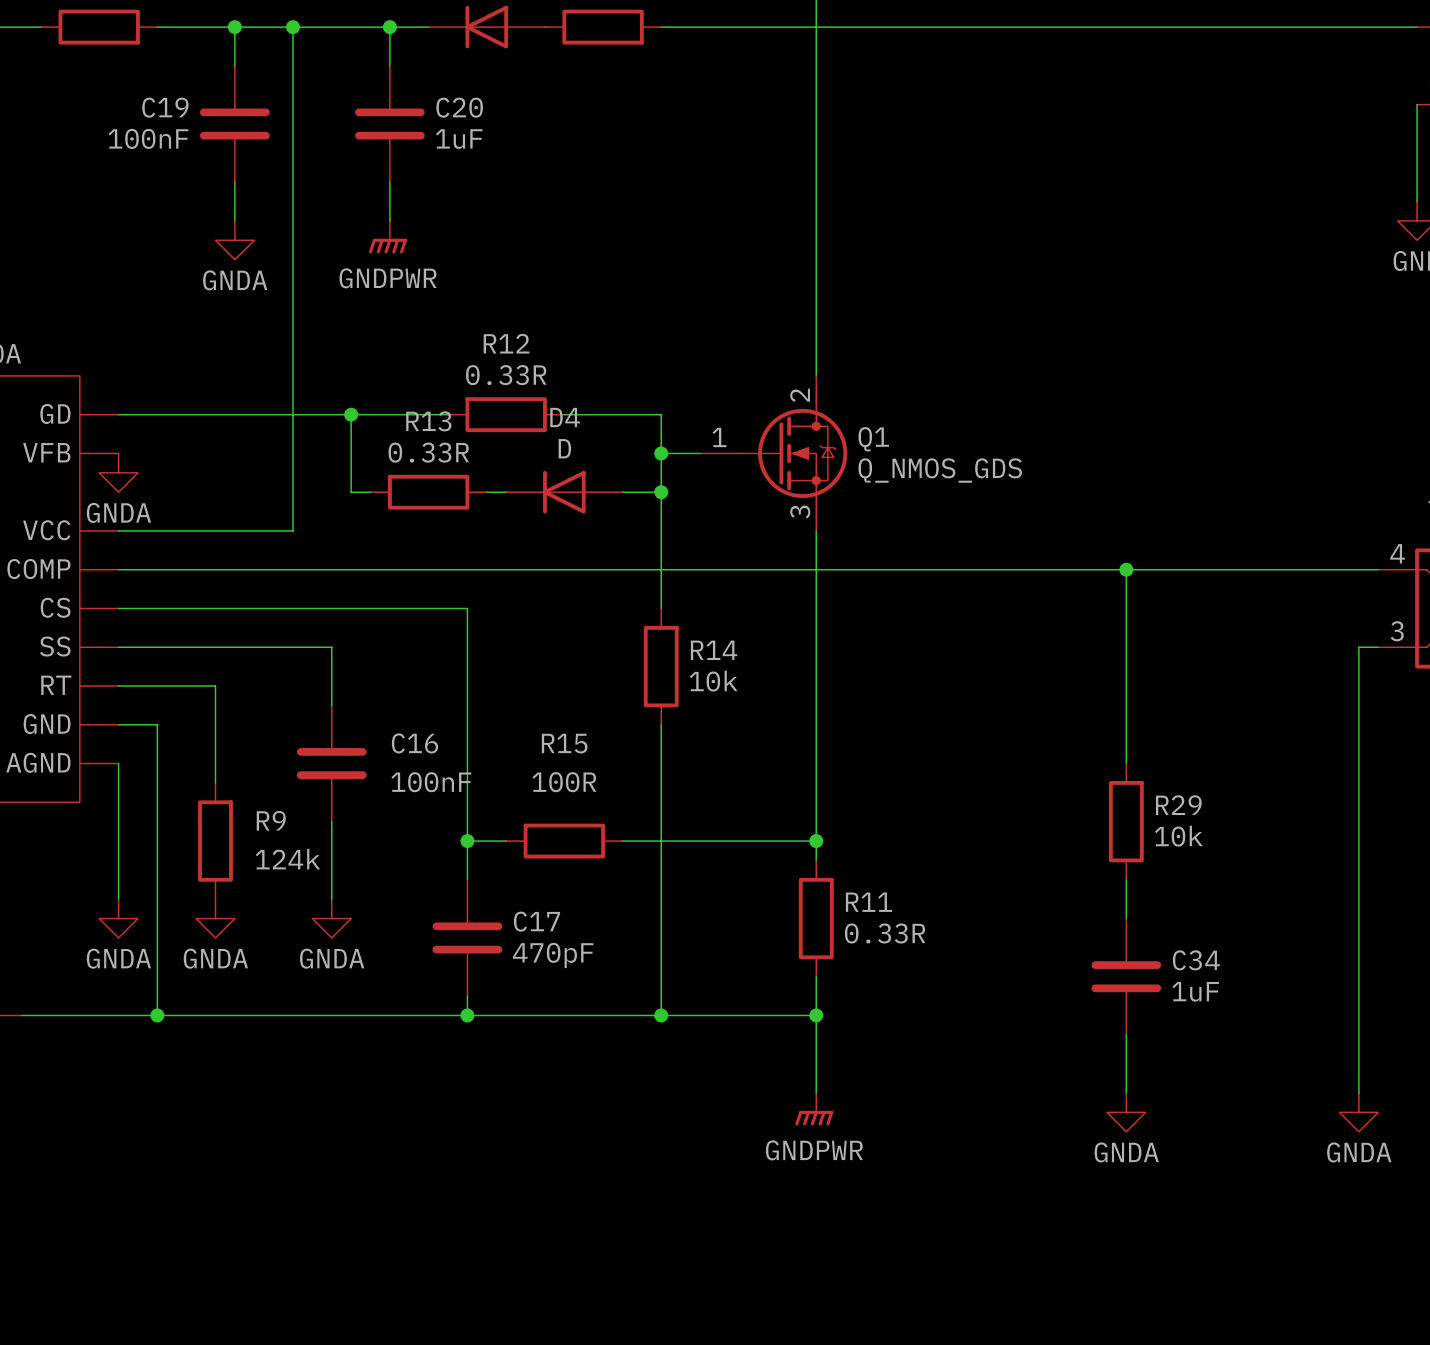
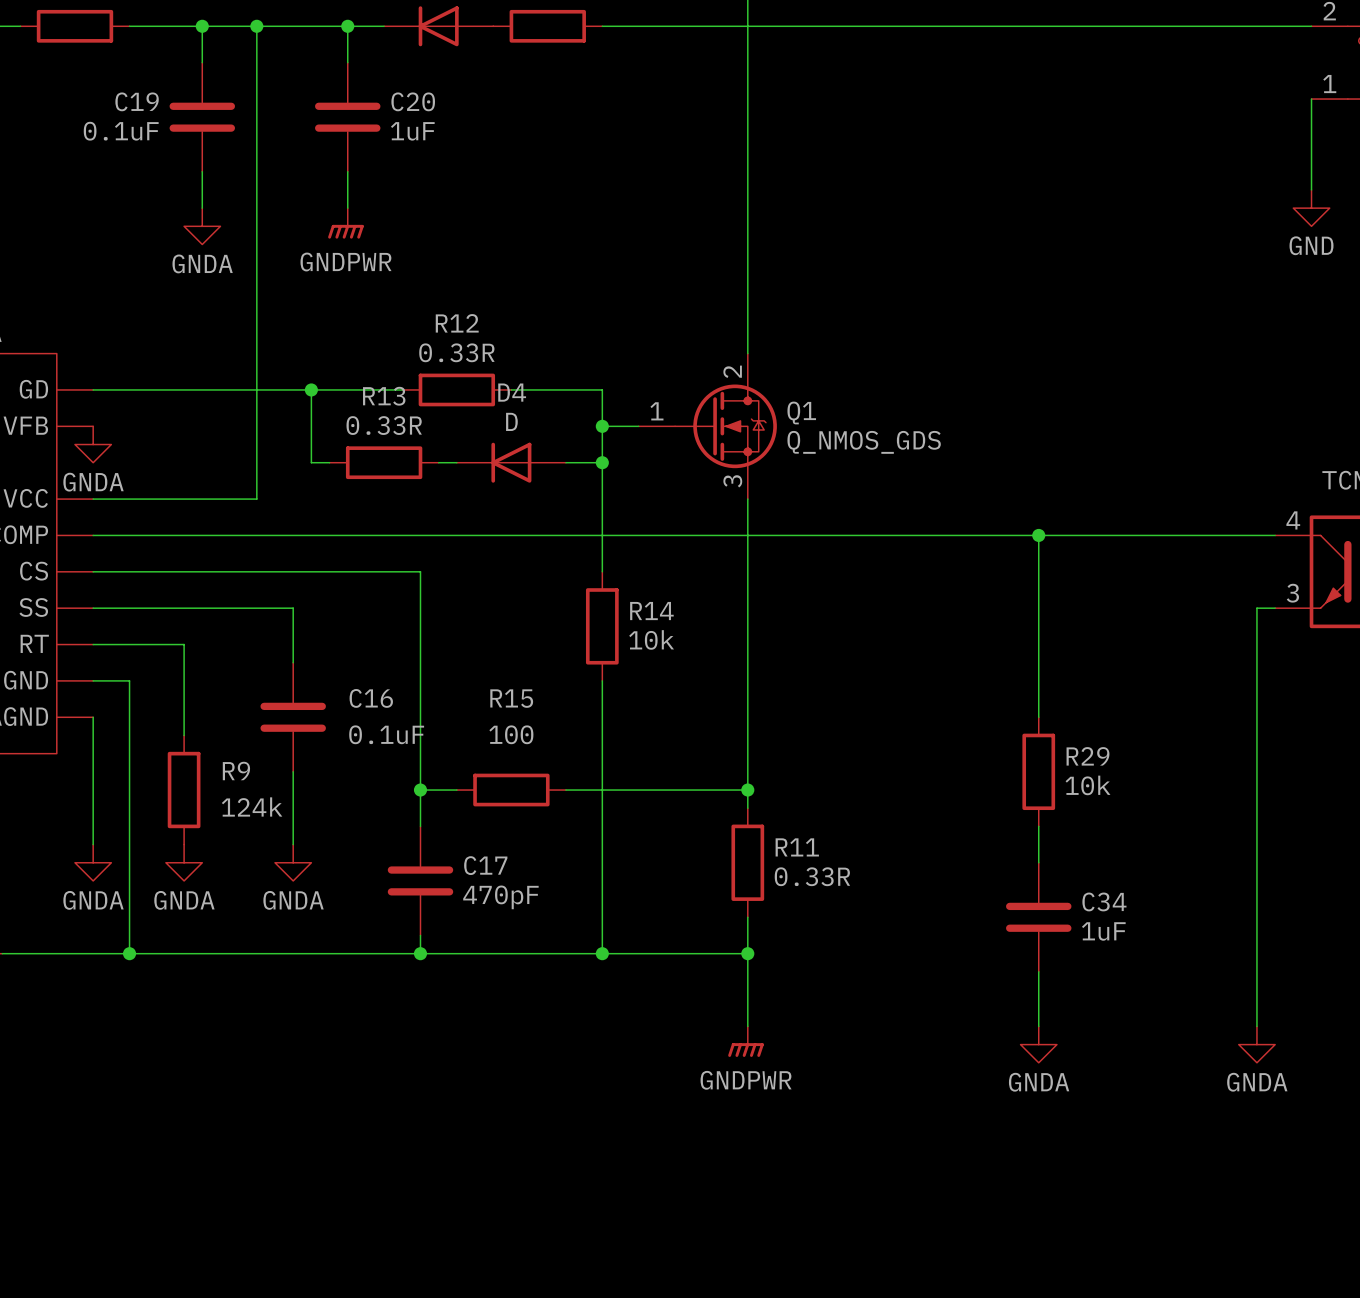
C19 value: 100nF (148, 138) -> 0.1uF (121, 131)
C16 value: 100nF (431, 782) -> 0.1uF (386, 734)
R15 value: 100R (564, 782) -> 100 (511, 734)

